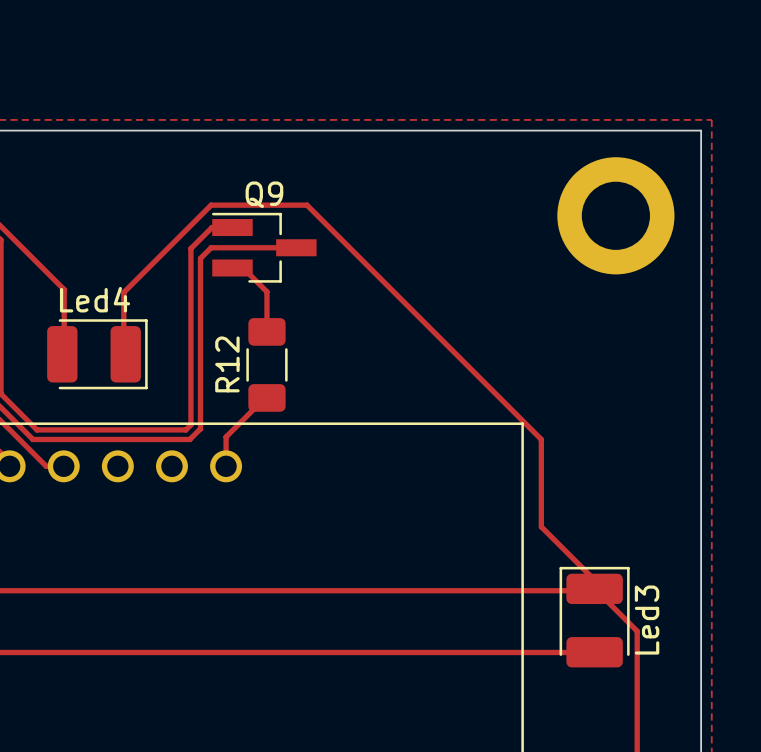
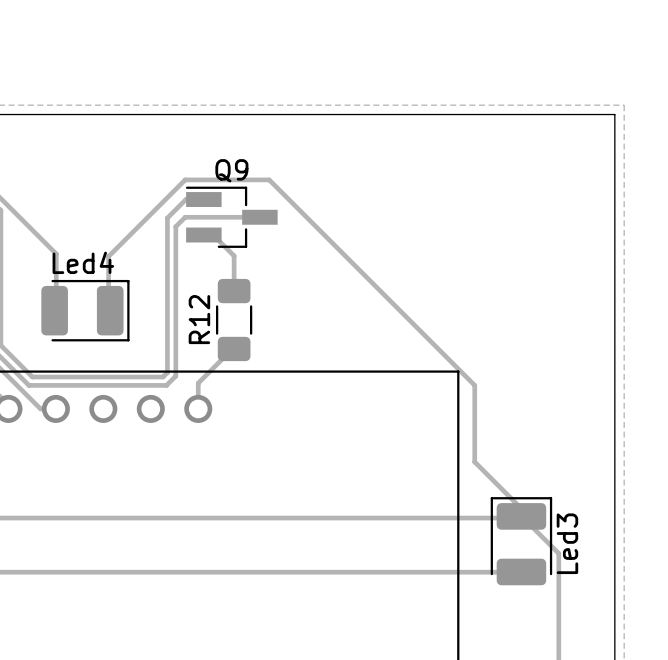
part: (615, 215) -> none

